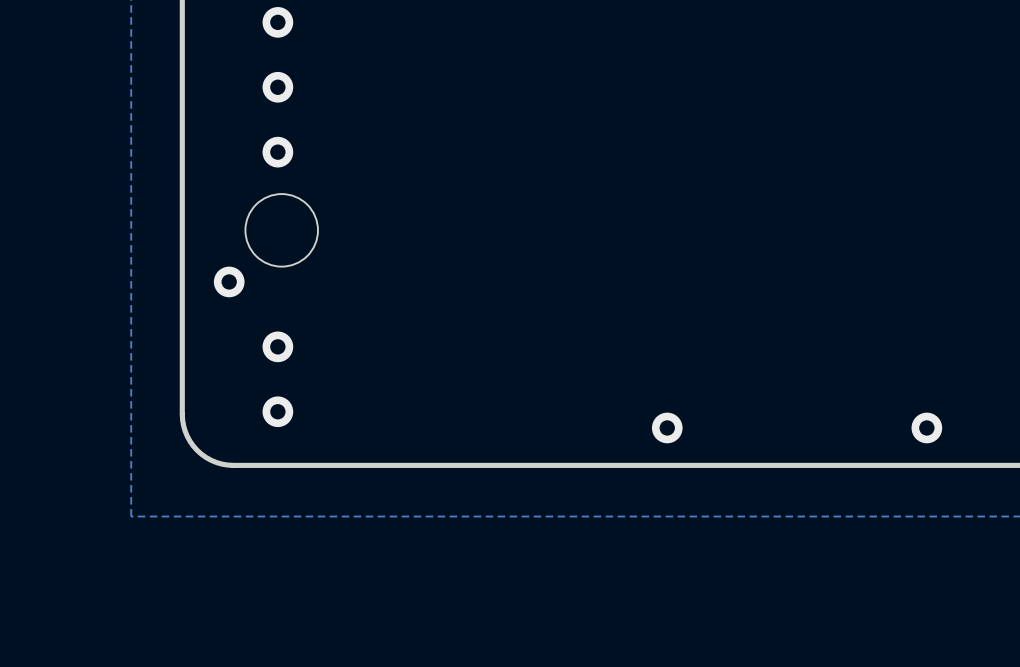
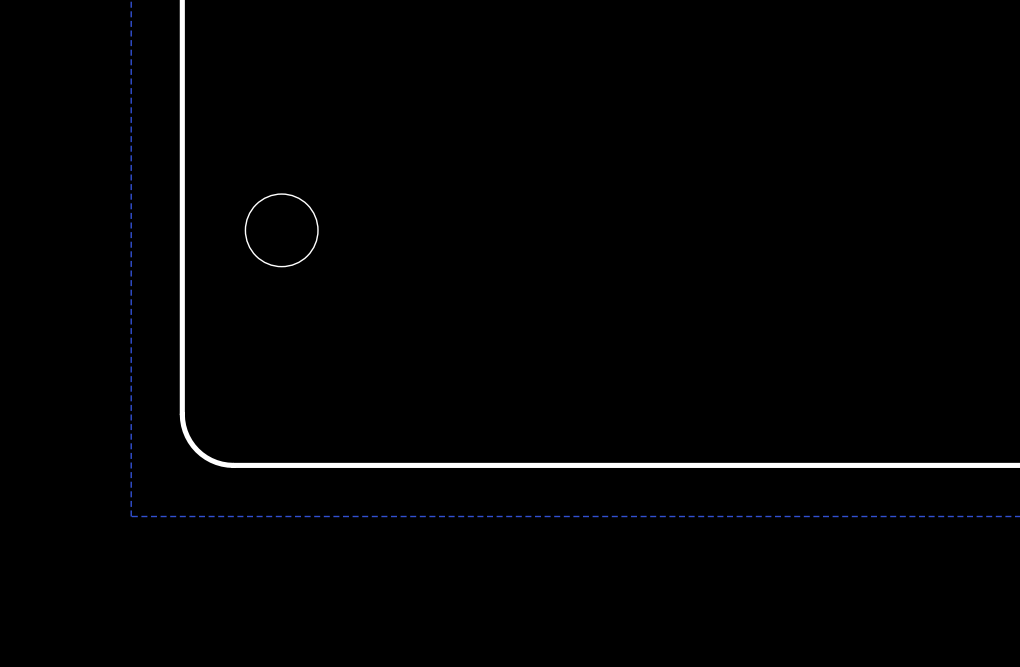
via: (277, 22) -> none
via: (277, 87) -> none
via: (277, 152) -> none
via: (229, 281) -> none
via: (277, 346) -> none
via: (277, 411) -> none
via: (667, 427) -> none
via: (926, 427) -> none

